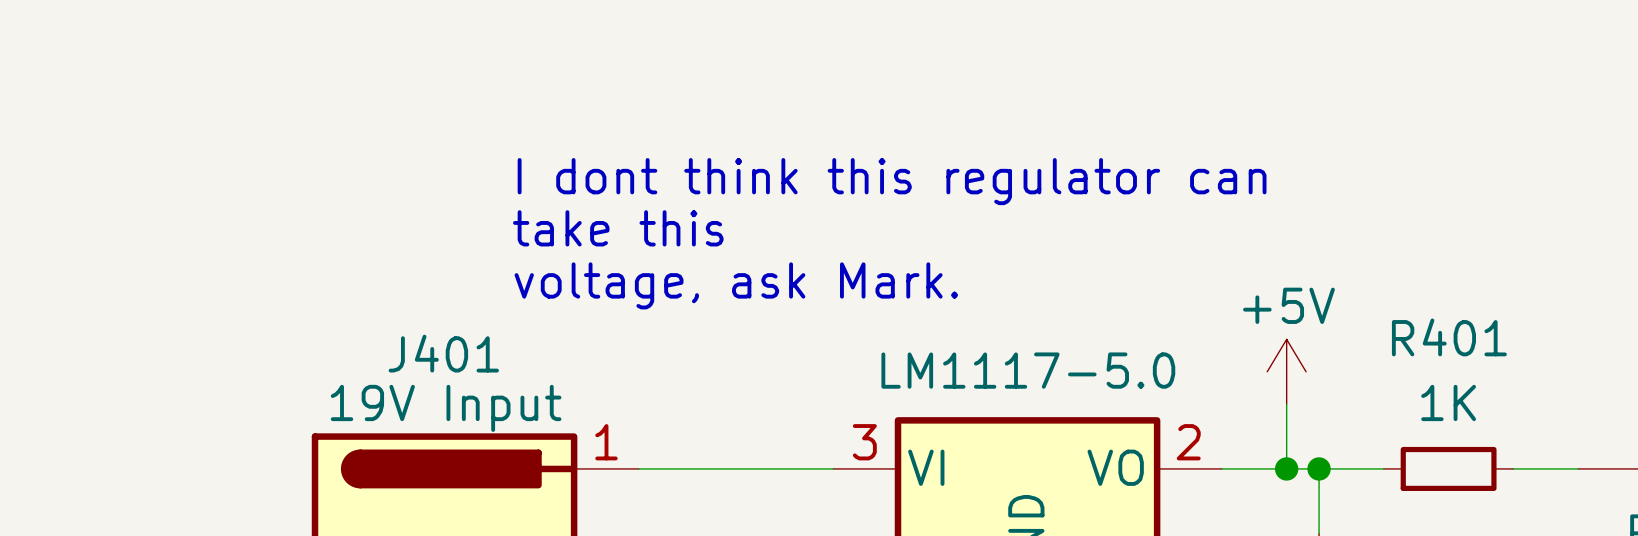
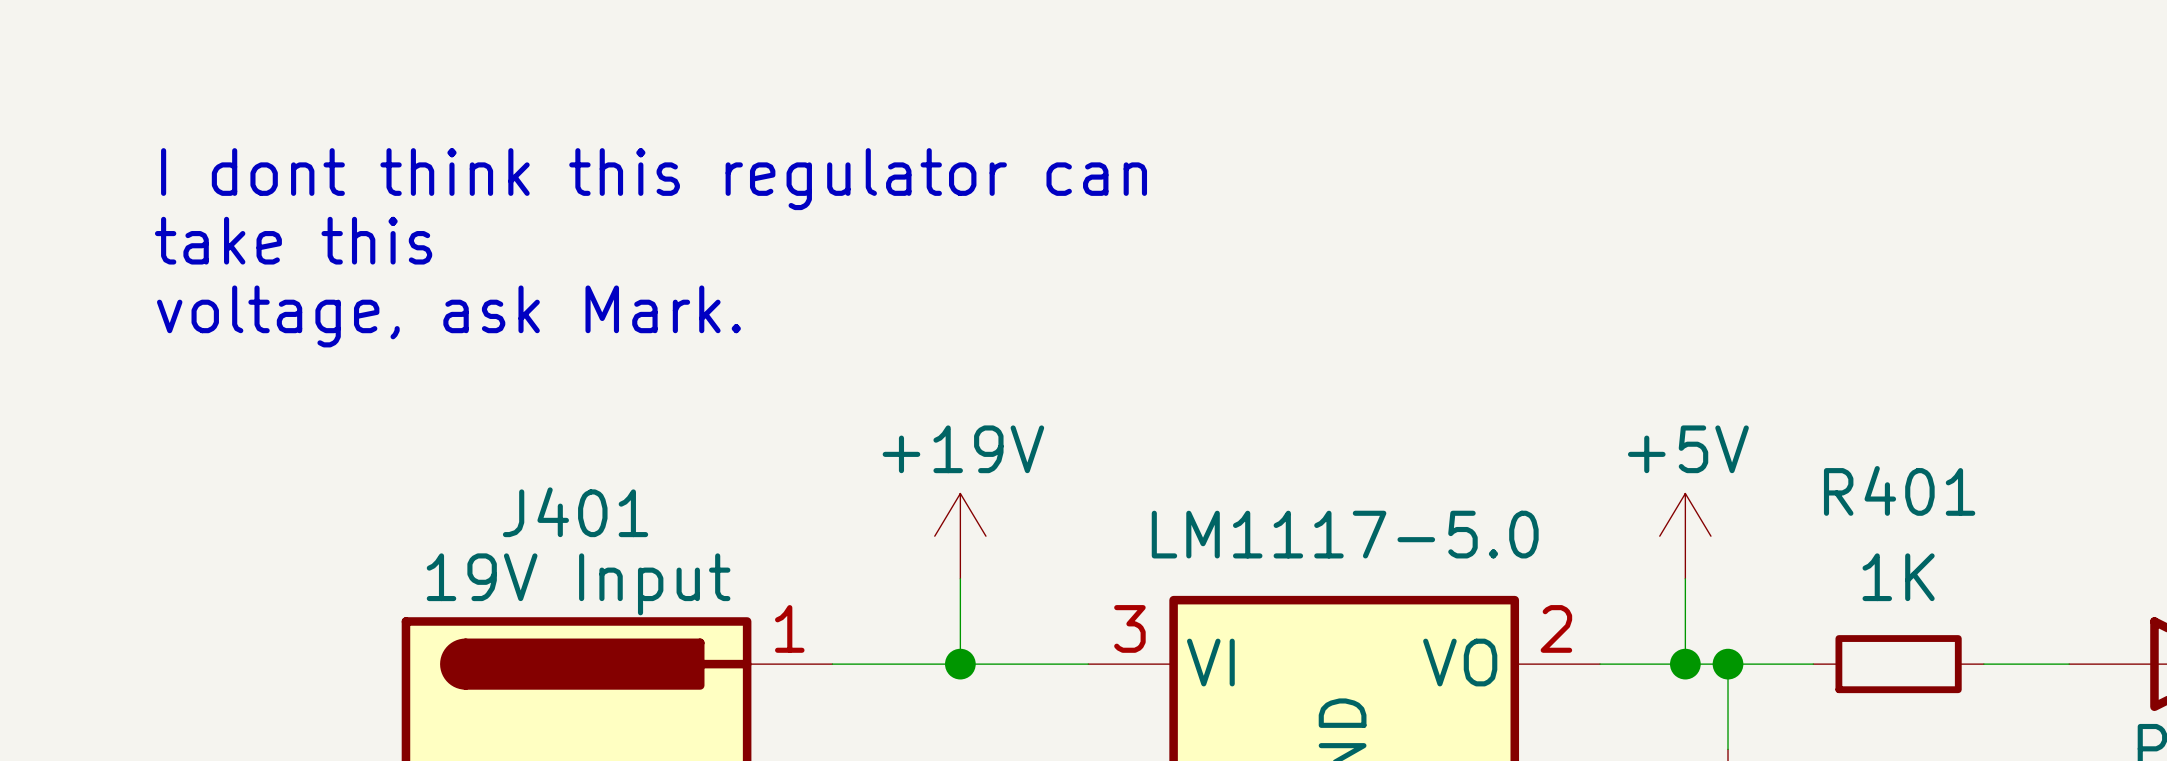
text position: I dont think this regulator can (892, 181) -> I dont think this regulator can (654, 179)
text position: take this (618, 228) -> take this (293, 240)
text position: voltage, ask Mark. (736, 285) -> voltage, ask Mark. (448, 316)
power symbol: none -> +19V (960, 536)
wire: none -> (960, 578) (960, 664)
junction: none -> (960, 664)

